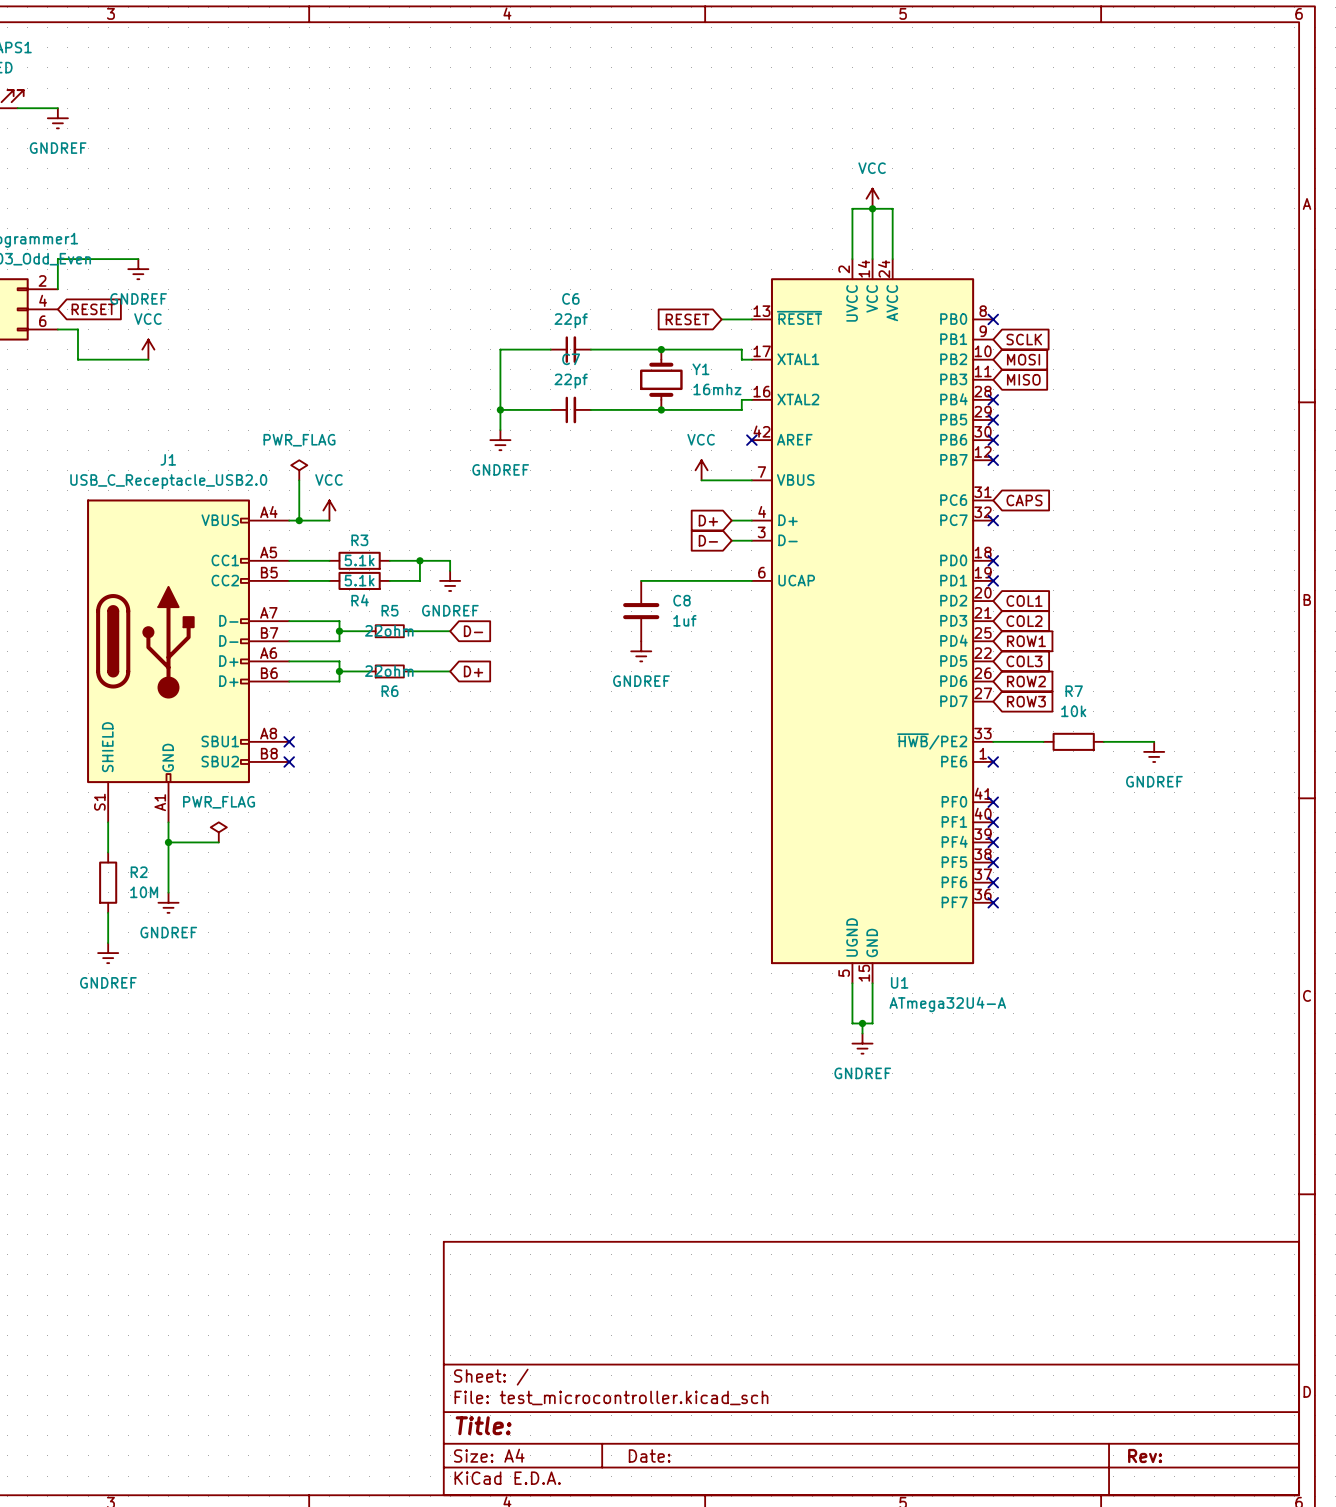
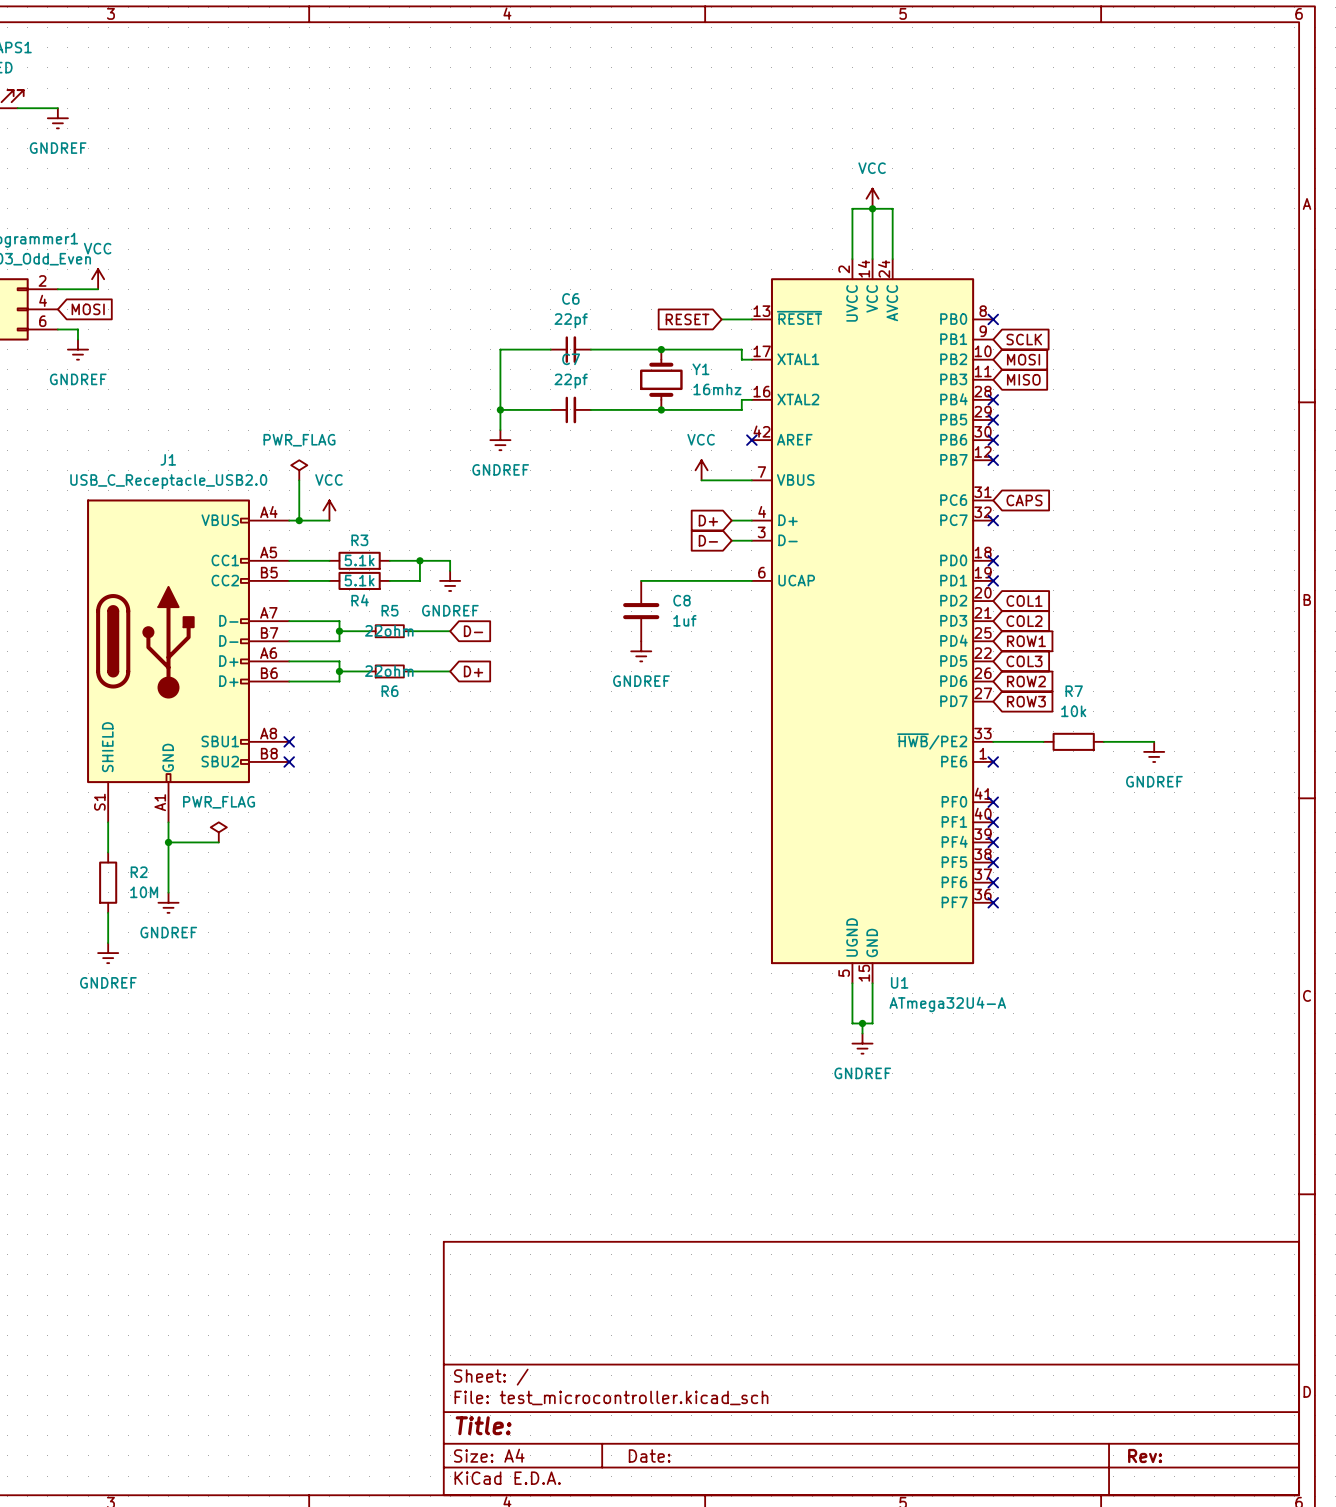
wire: (138, 259) (57, 259) (57, 289) -> (98, 289) (57, 289)
power symbol position: GNDREF (138, 269) -> GNDREF (77, 349)
global label: RESET (93, 309) -> MOSI (88, 309)
wire: (77, 339) (77, 359) (148, 359) -> none
power symbol position: VCC (148, 349) -> VCC (98, 279)

